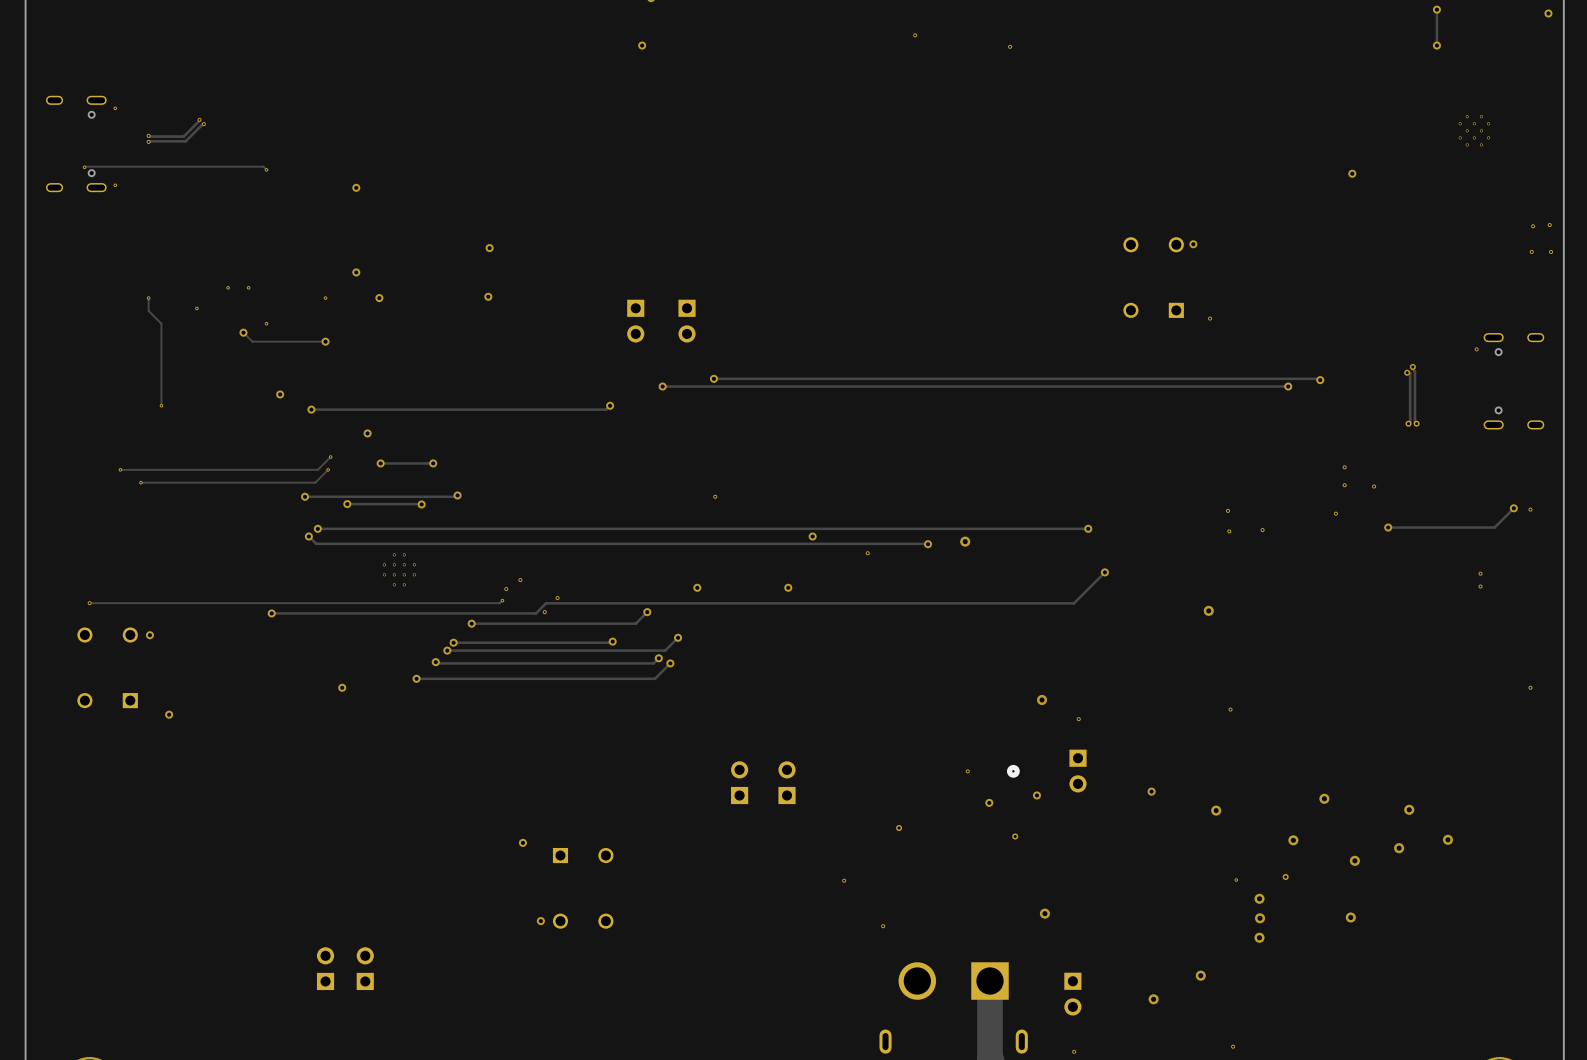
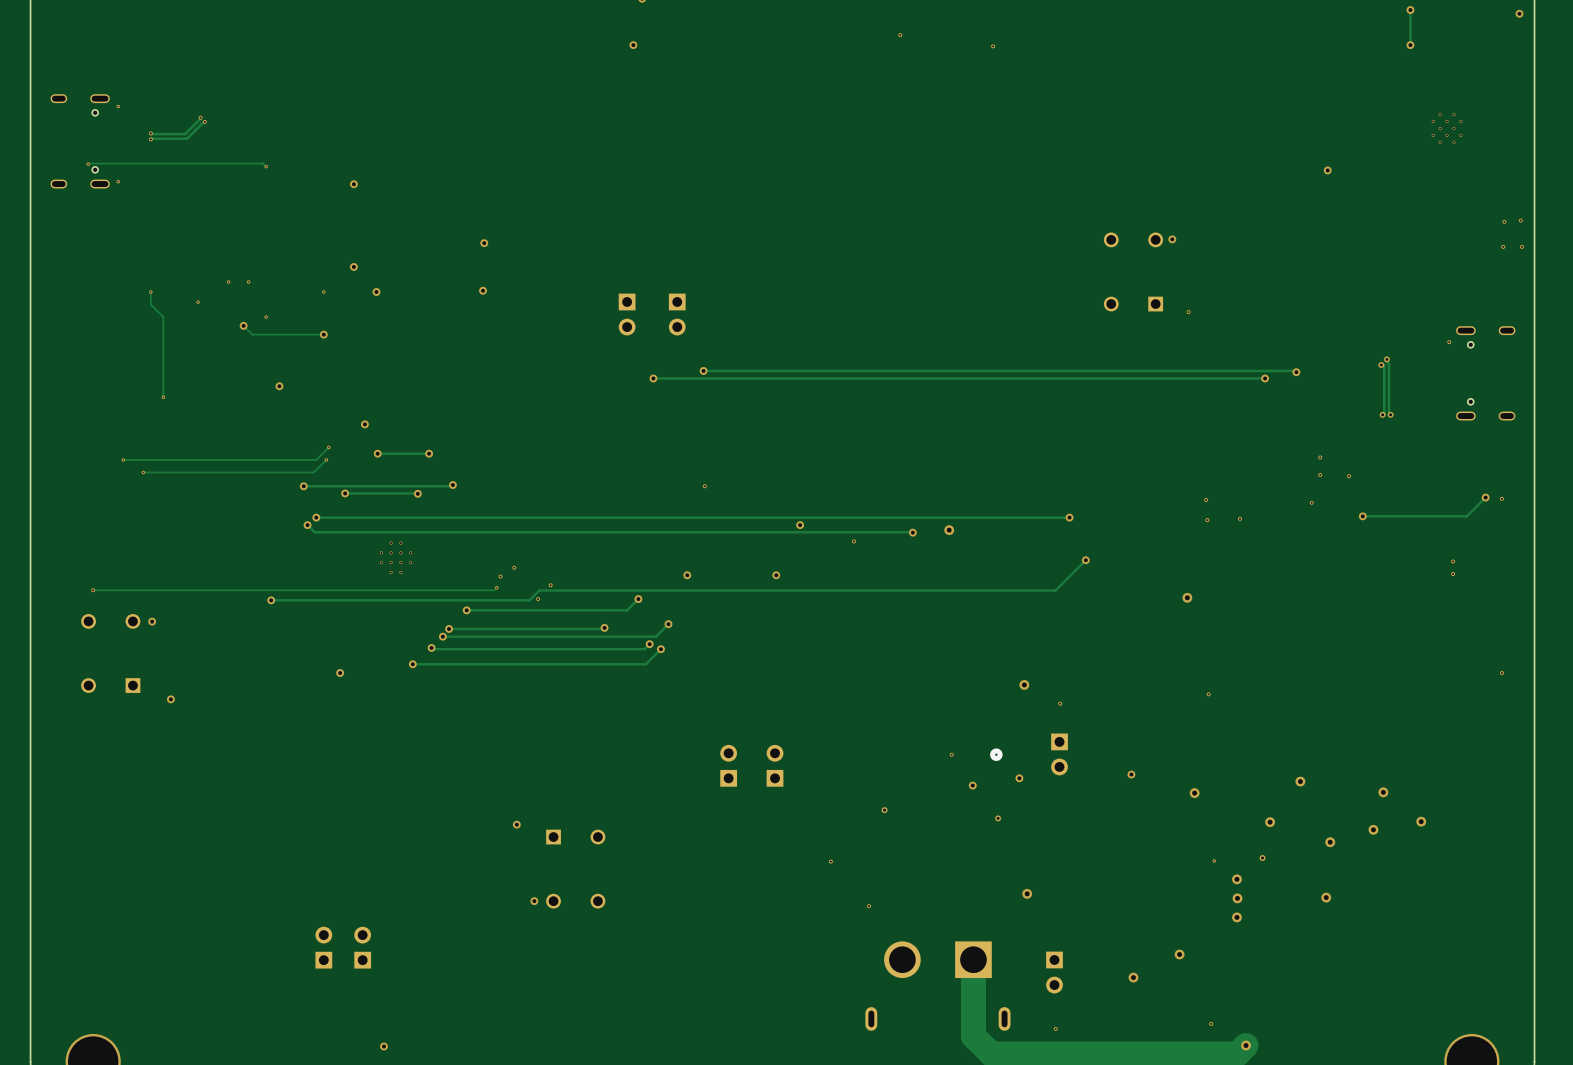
track: (610, 405) (606, 409) (311, 409) -> none
via: (610, 405) -> none
via: (311, 409) -> none

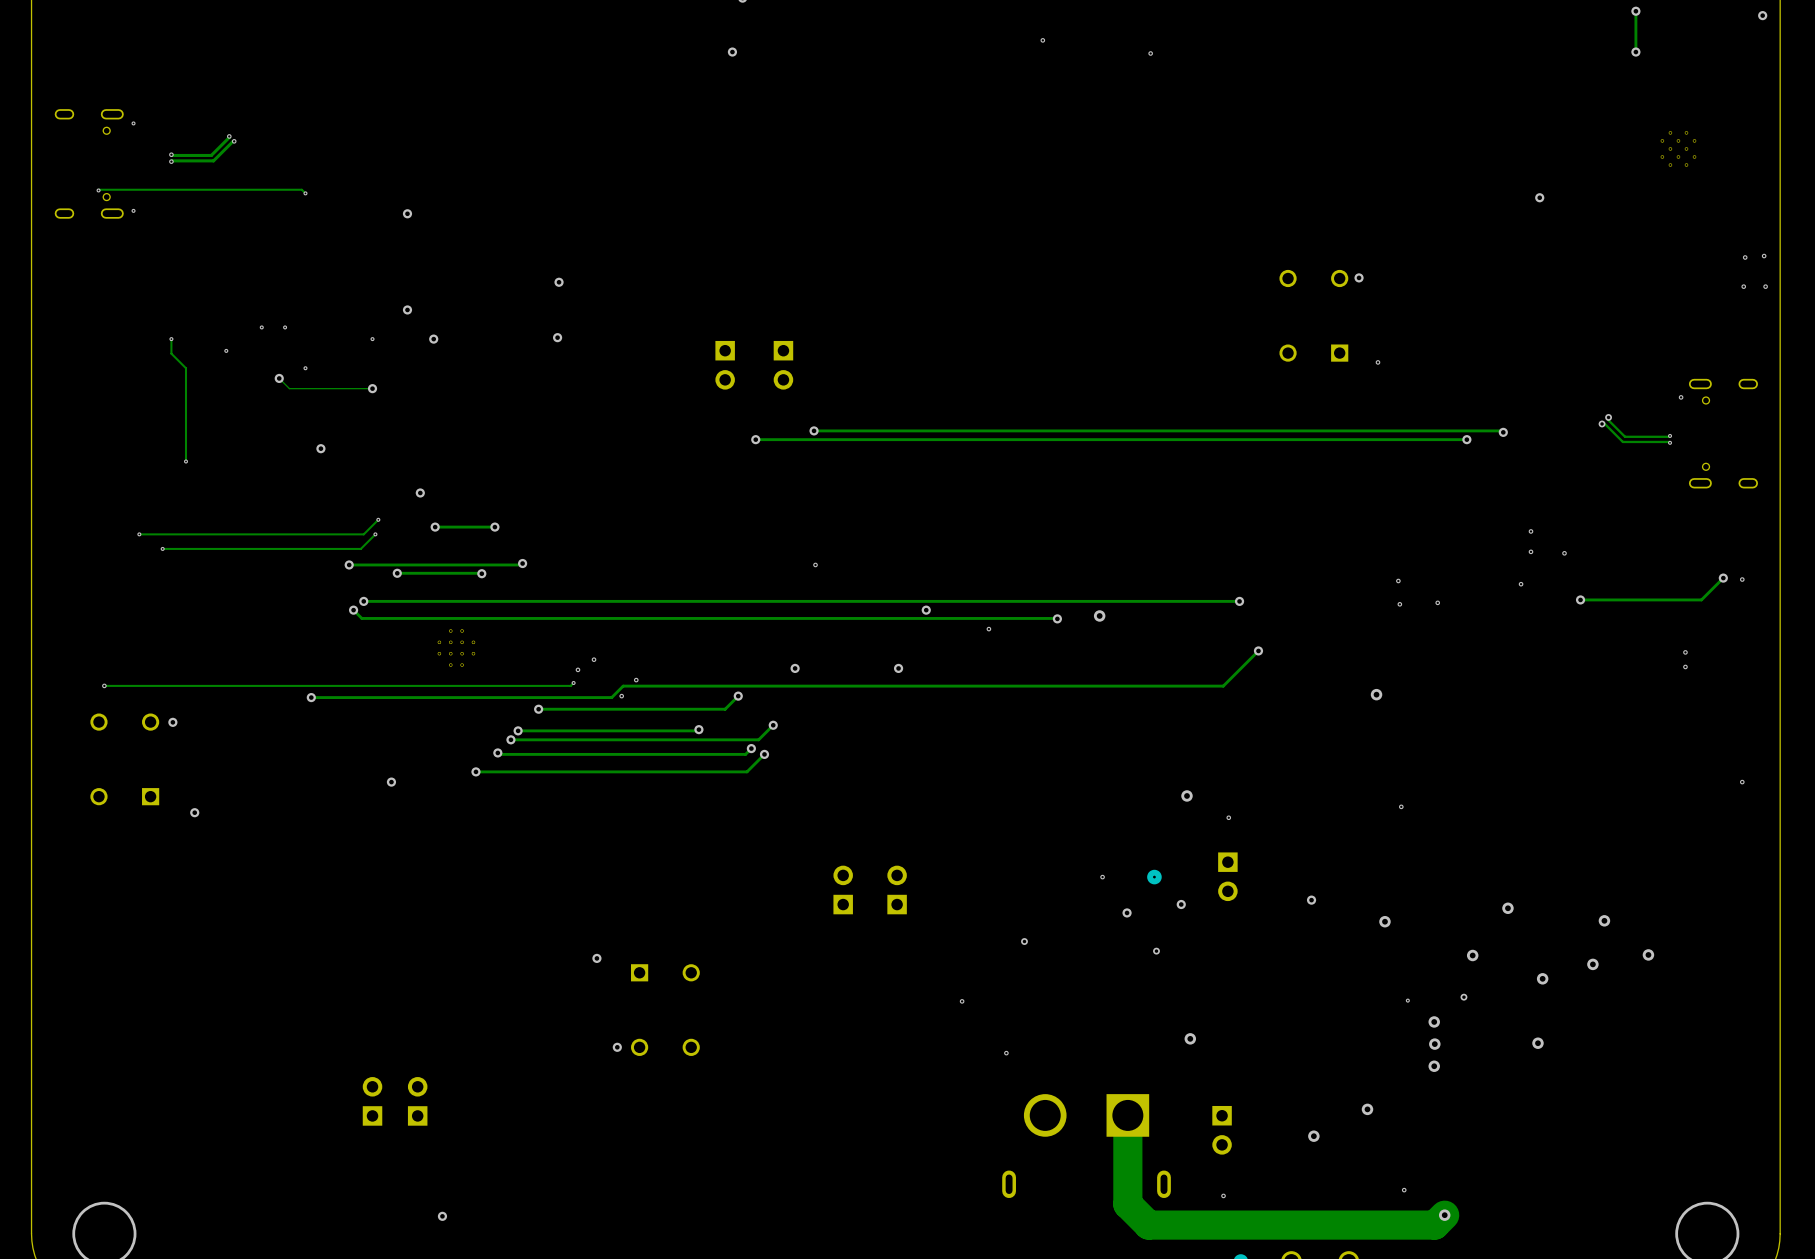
track: (1386, 359) (1388, 363) (1388, 413) (1390, 414) -> none
track: none -> (1607, 418) (1625, 436) (1670, 435)
track: none -> (1603, 423) (1622, 441) (1670, 442)
track: (1381, 365) (1384, 365) (1384, 413) (1382, 414) -> none
via: none -> (1670, 435)
via: none -> (1670, 442)
via: (1382, 414) -> none
via: (1390, 414) -> none

